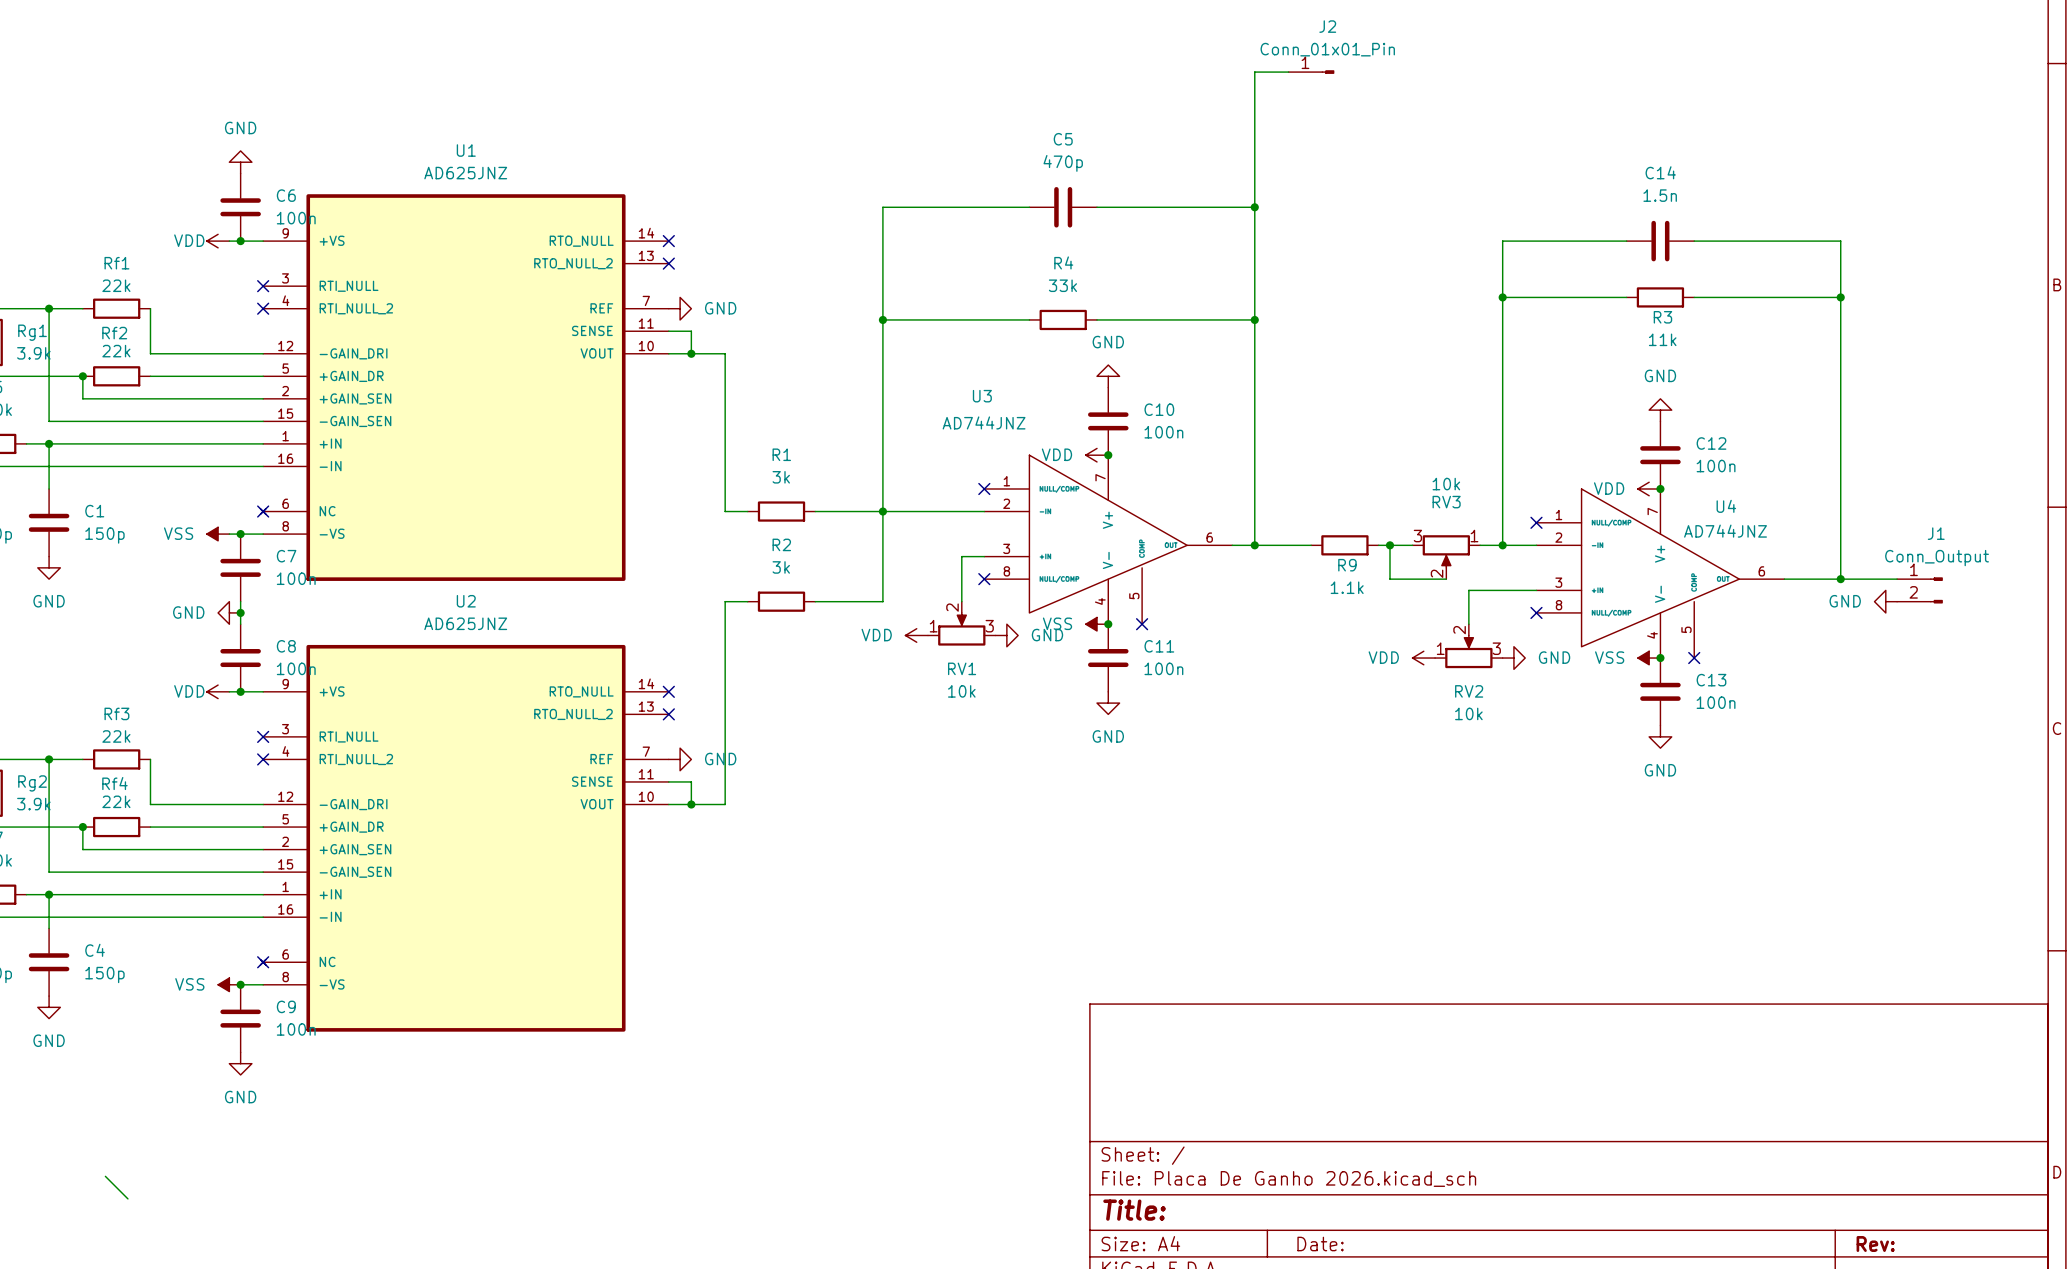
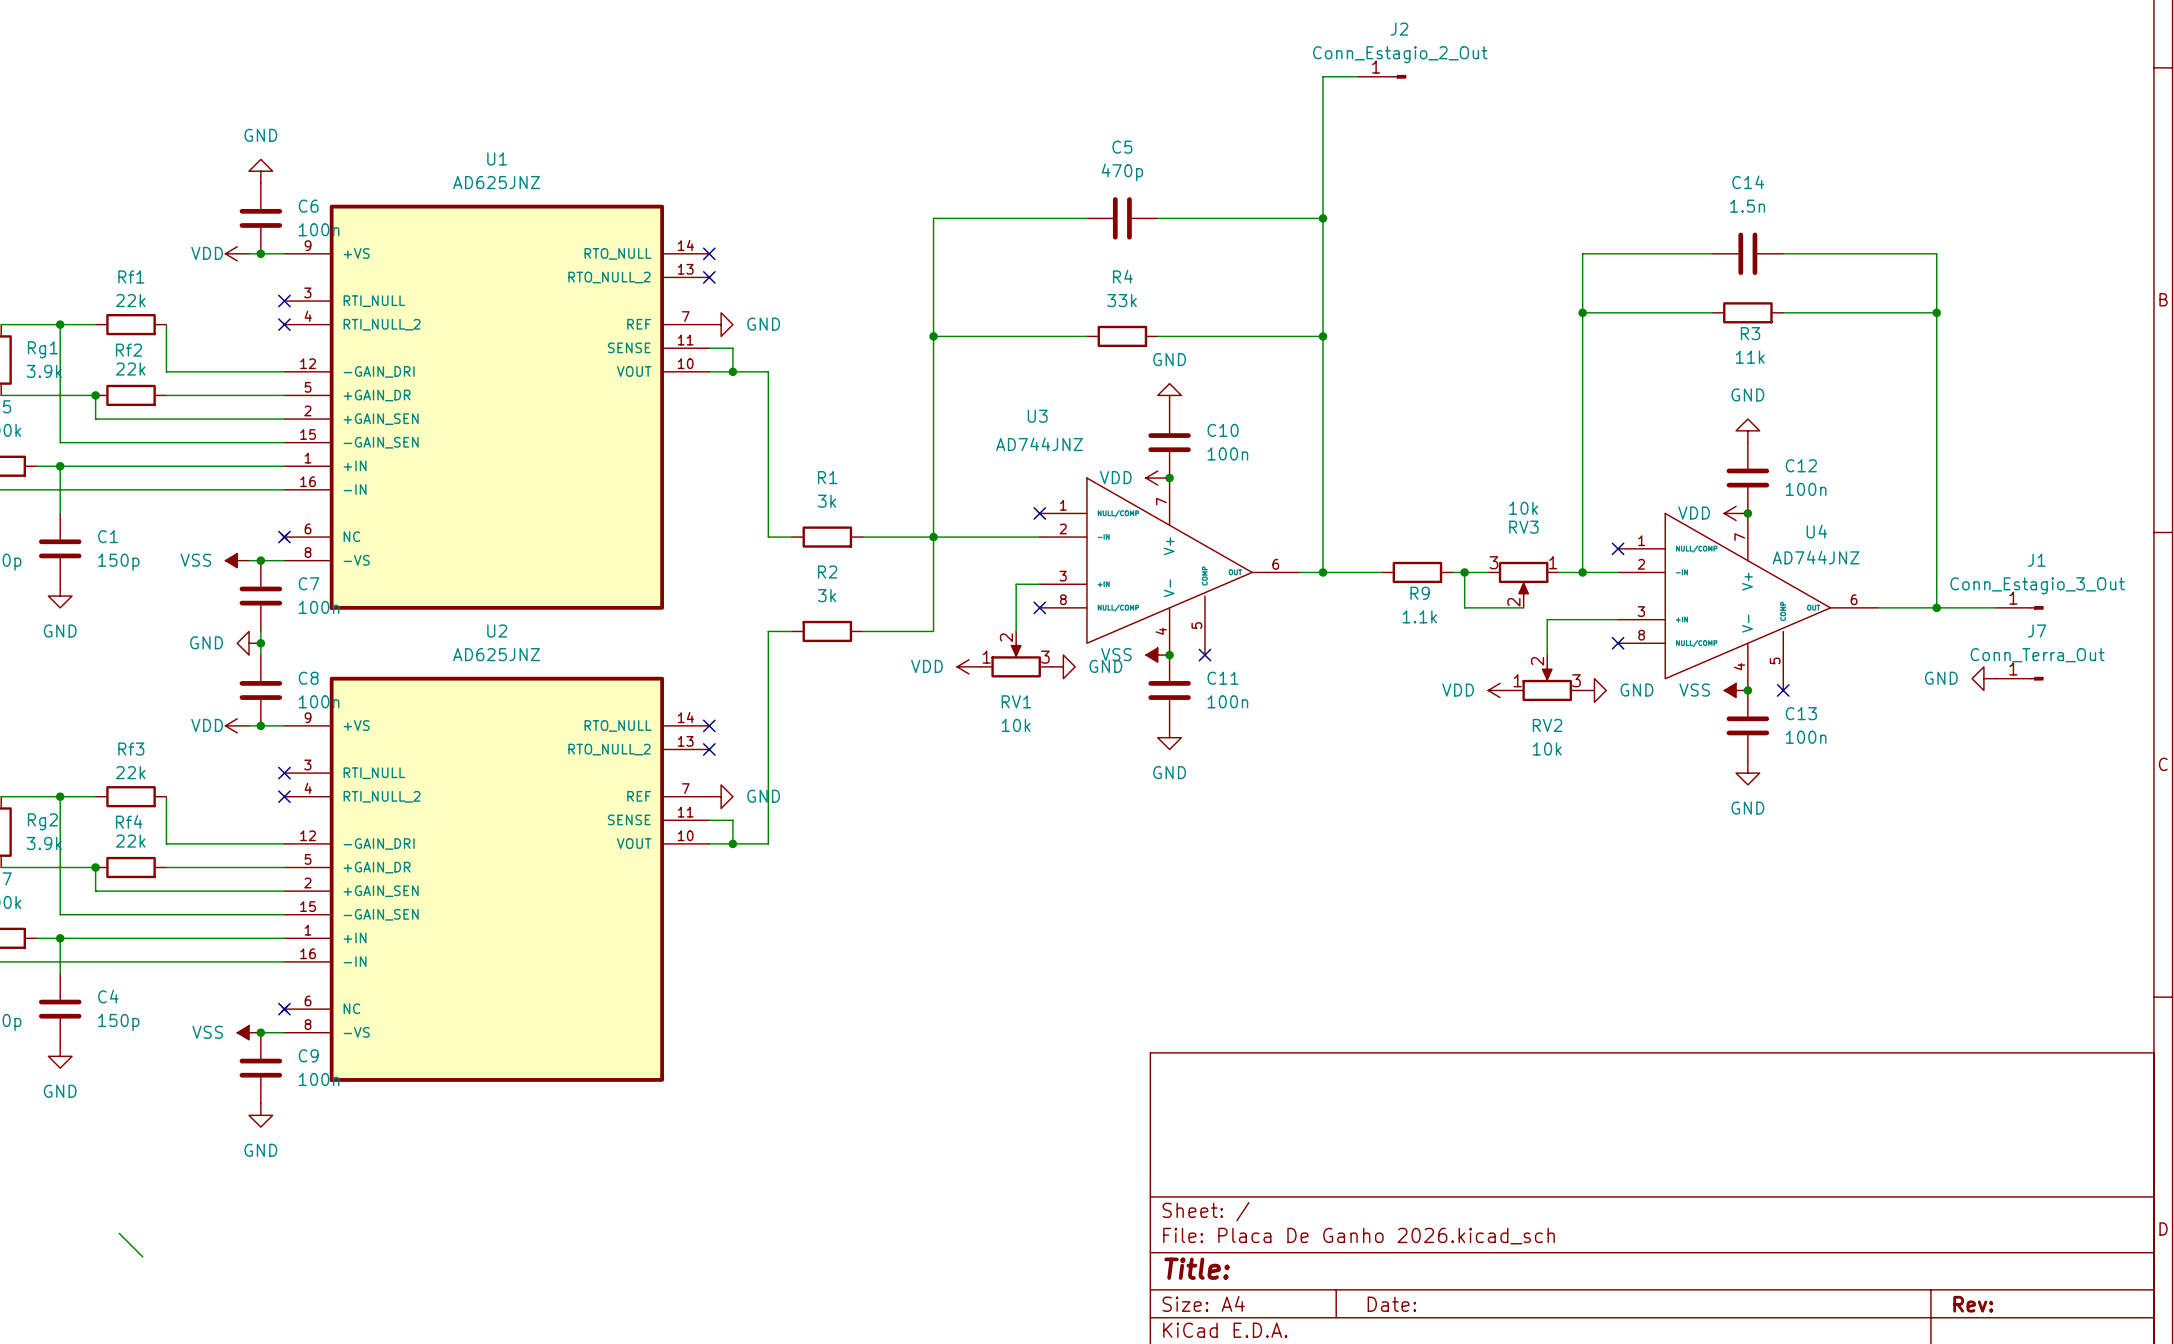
J2 value: Conn_01x01_Pin (1327, 49) -> Conn_Estagio_2_Out (1400, 54)
J1 value: Conn_Output (1937, 558) -> Conn_Estagio_3_Out (2037, 585)
J1 symbol: [1897, 577, 1943, 604] -> [1995, 605, 2044, 610]
power symbol position: GND (1885, 601) -> GND (1983, 678)
J7: none -> Conn_Terra_Out (2019, 678)

